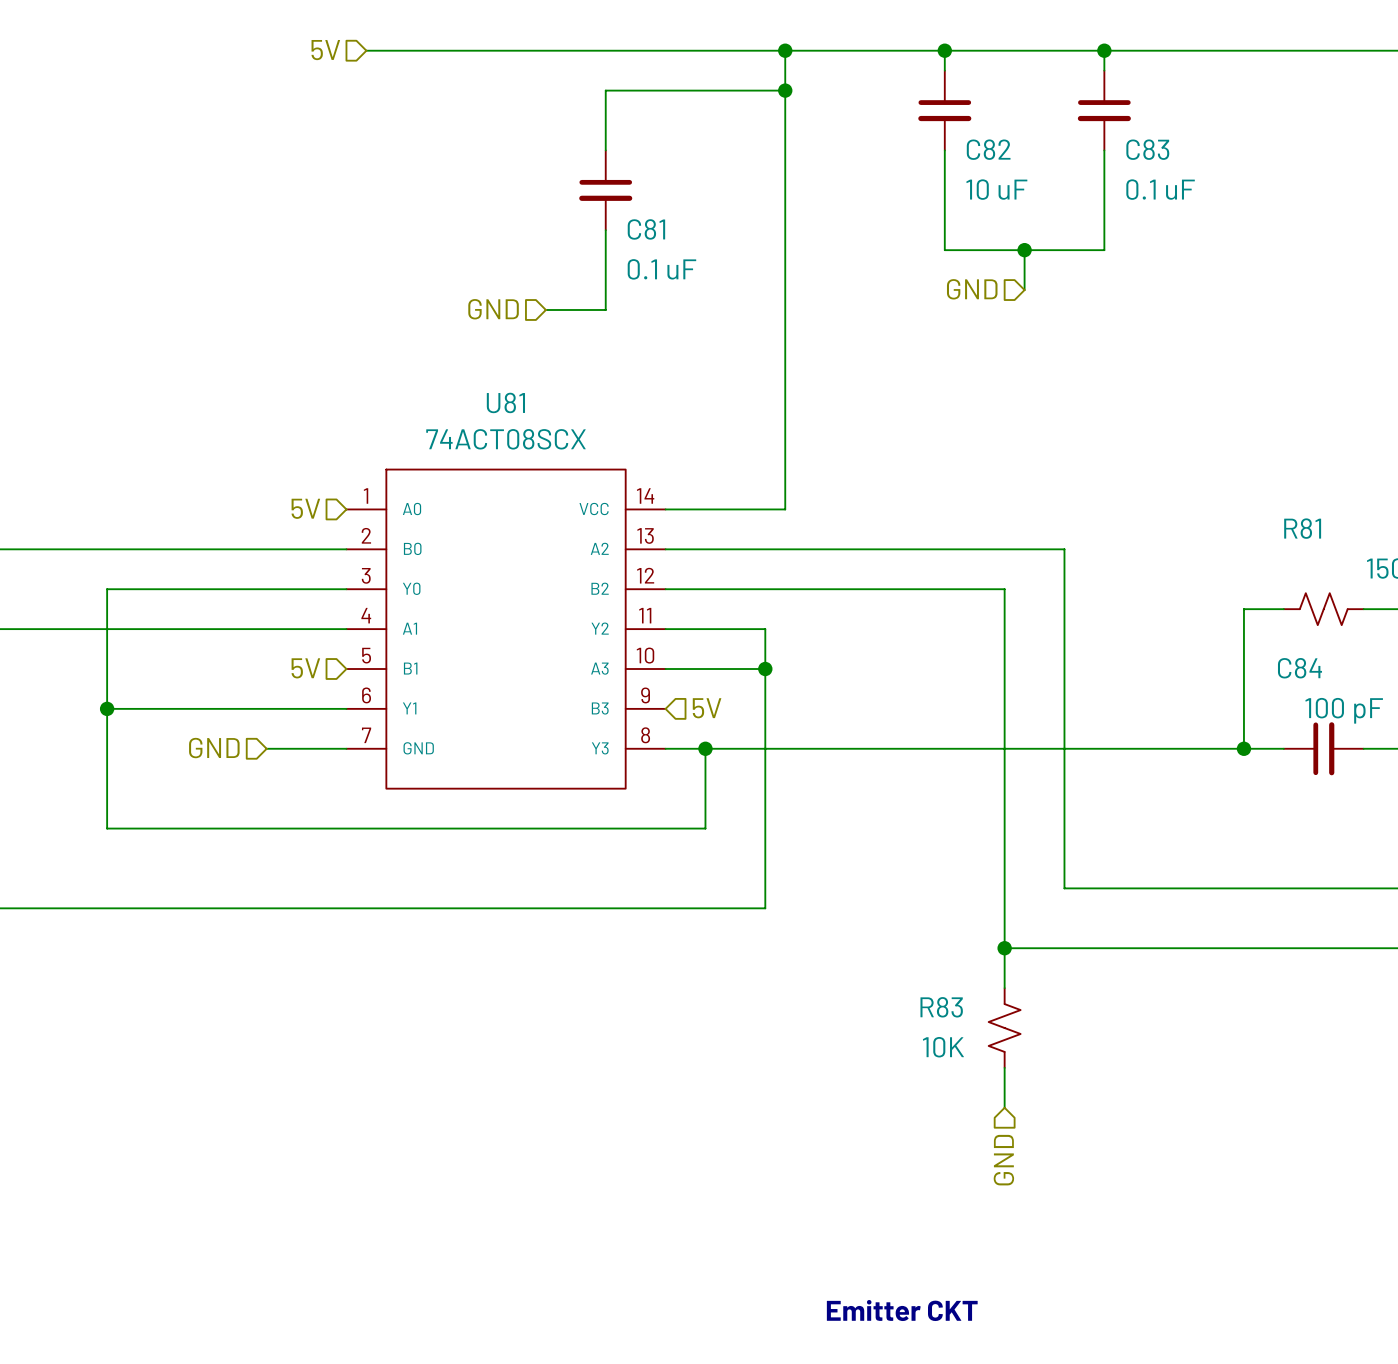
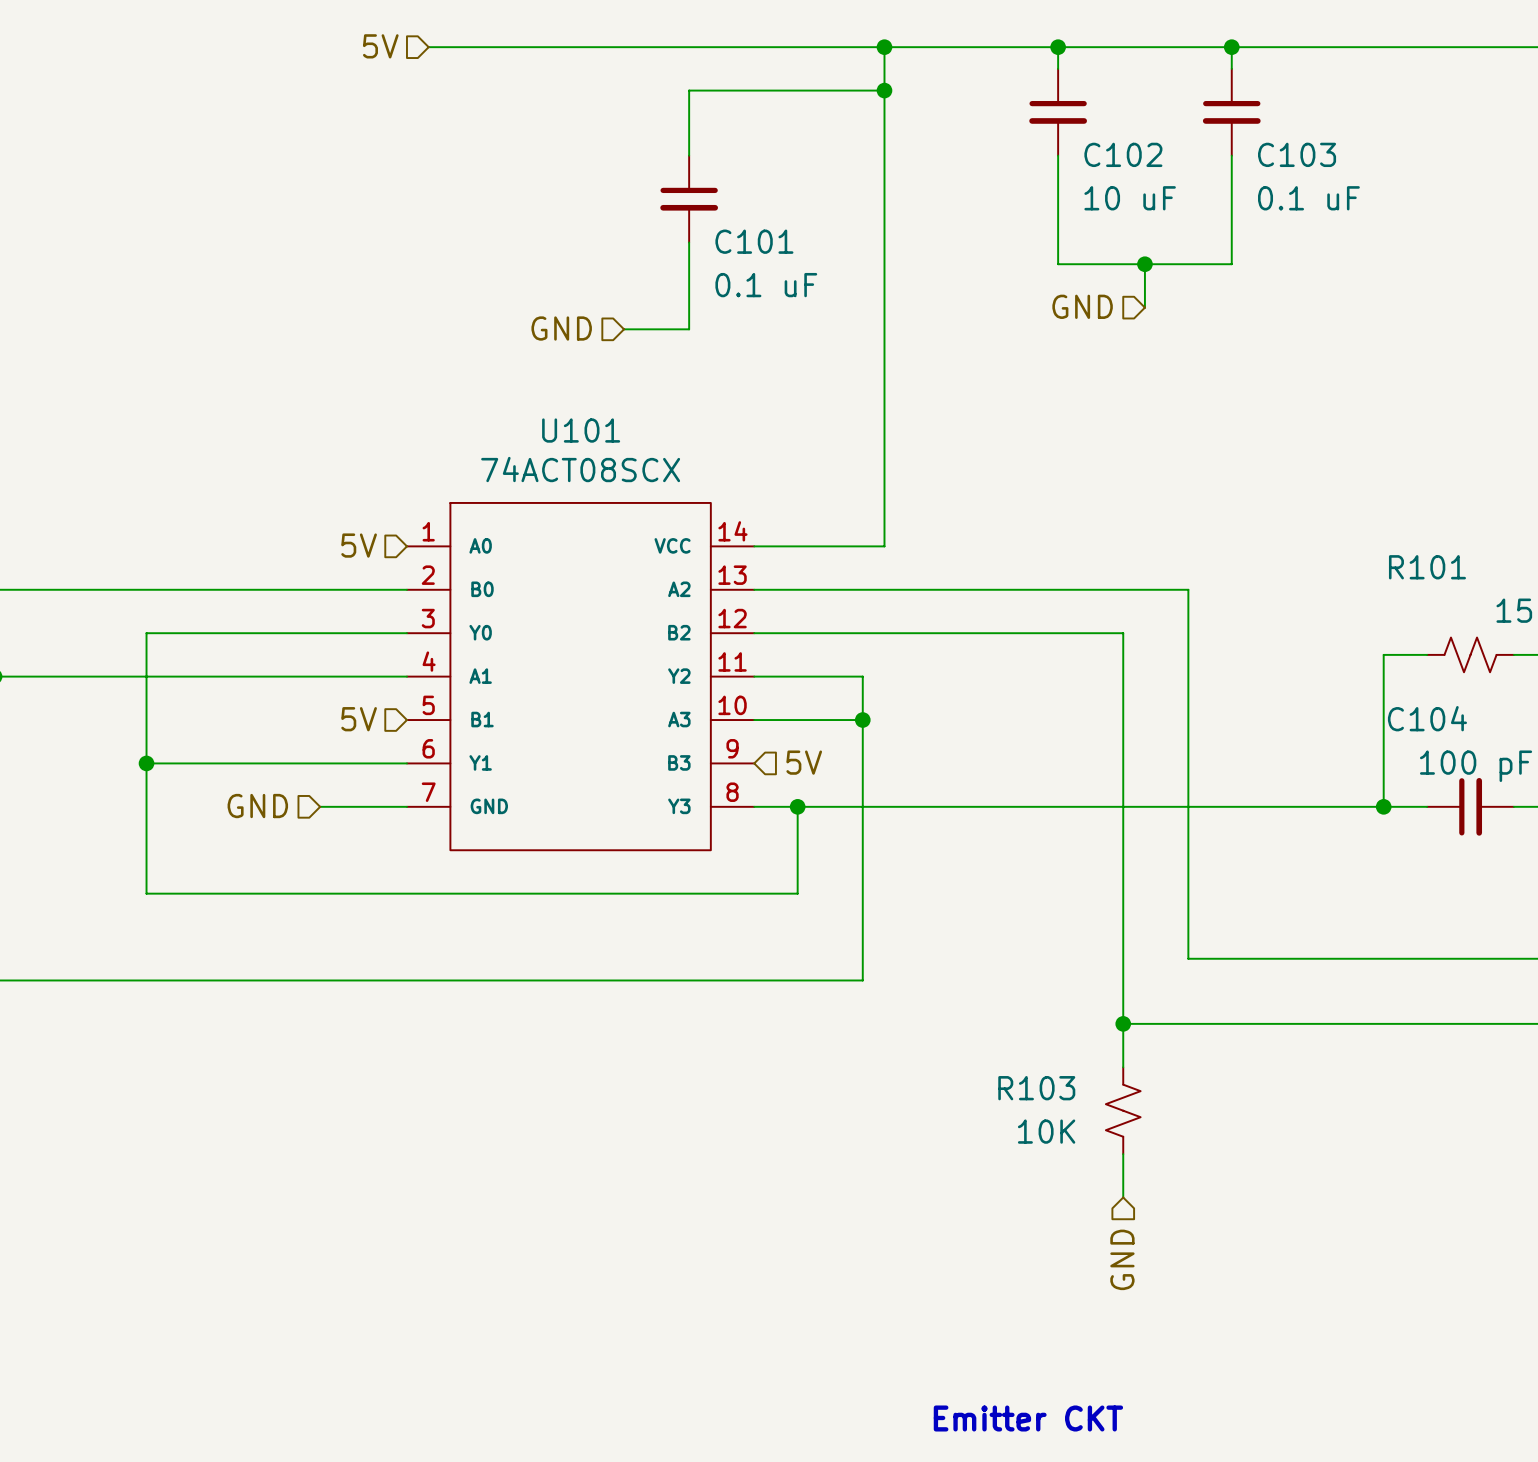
C82 name: C82 (988, 149) -> C102 (1123, 154)
C83 name: C83 (1147, 149) -> C103 (1297, 154)
C81 name: C81 (646, 229) -> C101 (754, 241)
U81 name: U81 (505, 402) -> U101 (581, 430)
R81 name: R81 (1302, 528) -> R101 (1427, 567)
C84 name: C84 (1299, 668) -> C104 (1427, 718)
R83 name: R83 (941, 1007) -> R103 (1036, 1088)

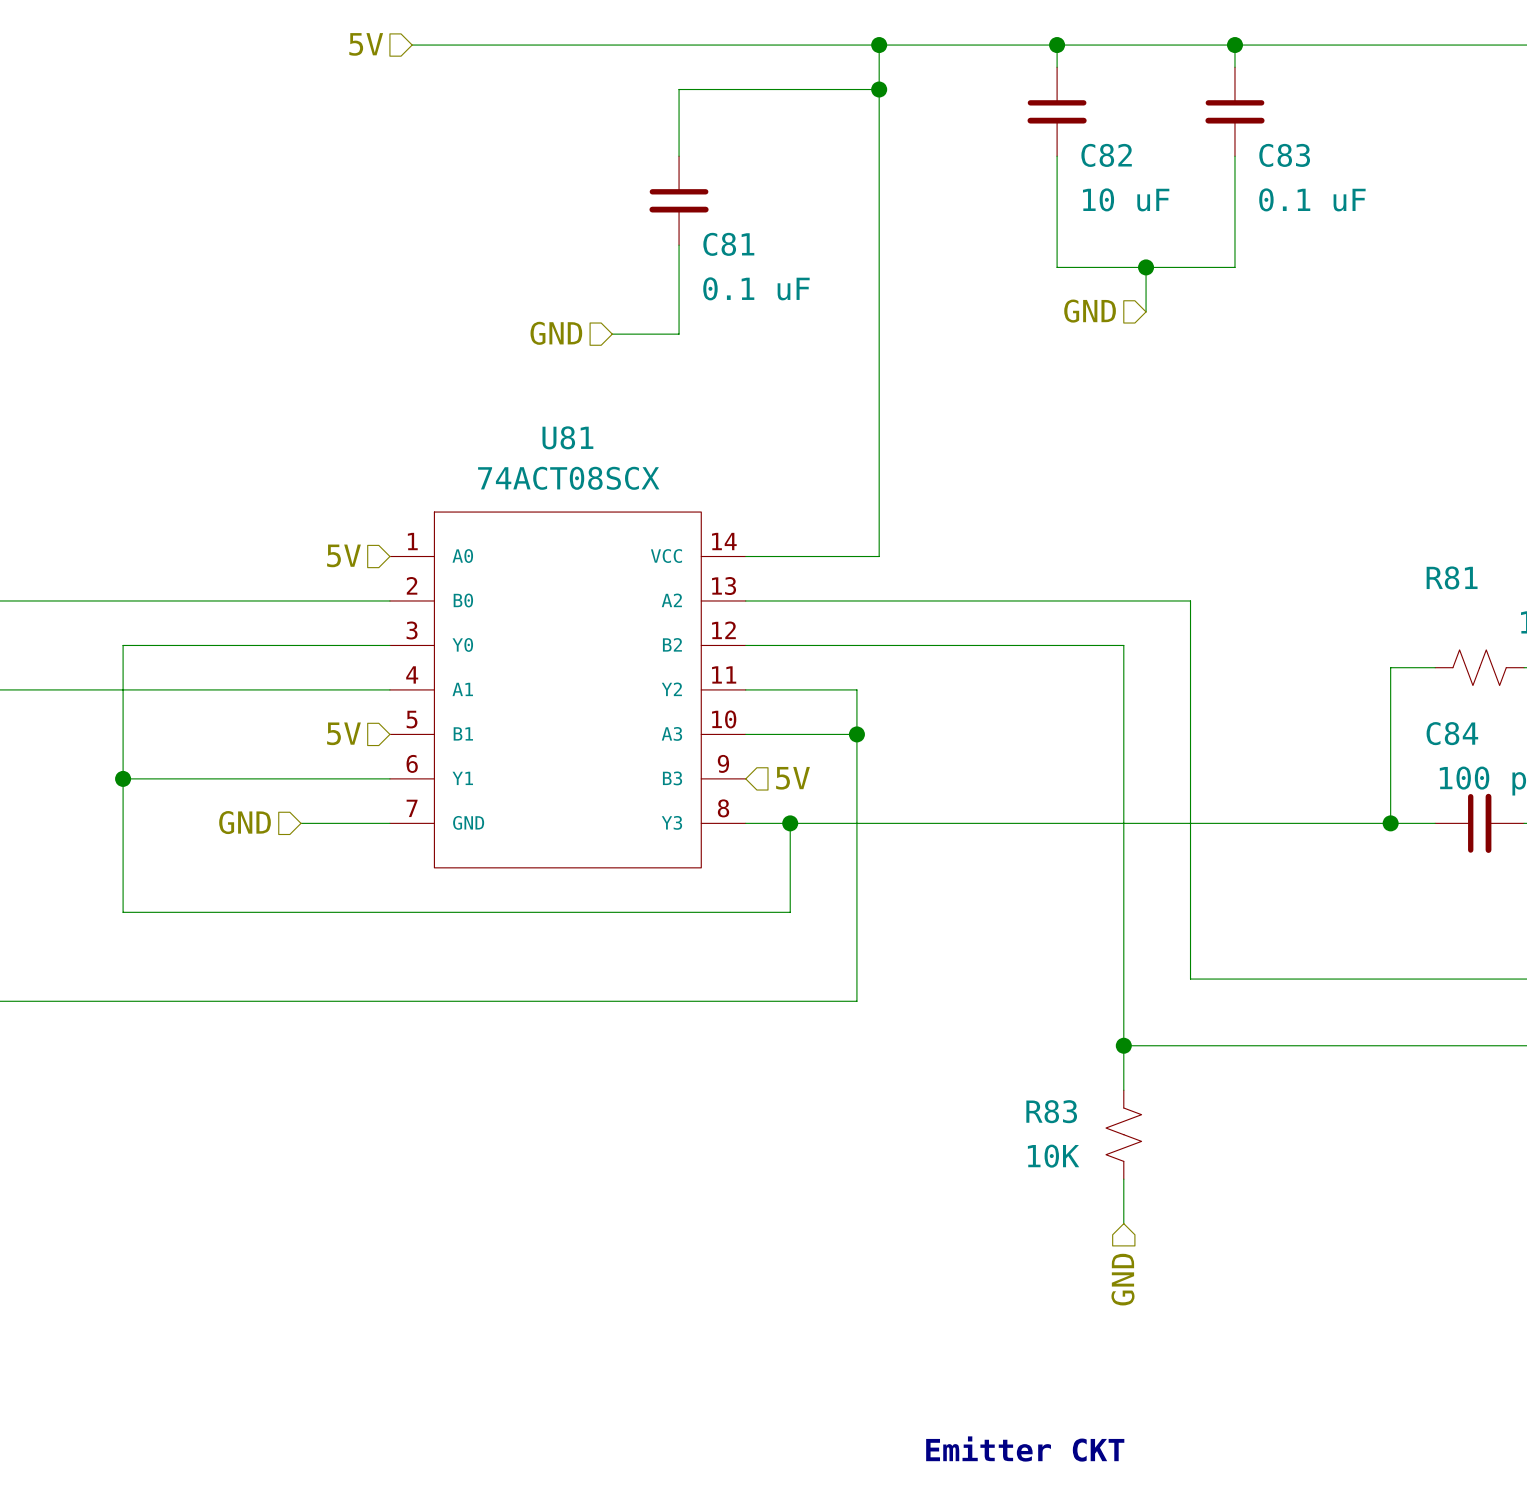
C102 name: C102 (1123, 154) -> C82 (1106, 155)
C103 name: C103 (1297, 154) -> C83 (1284, 155)
C101 name: C101 (754, 241) -> C81 (728, 244)
U101 name: U101 (581, 430) -> U81 (567, 437)
R101 name: R101 (1427, 567) -> R81 (1452, 577)
C104 name: C104 (1427, 718) -> C84 (1452, 733)
R103 name: R103 (1036, 1088) -> R83 (1051, 1111)

